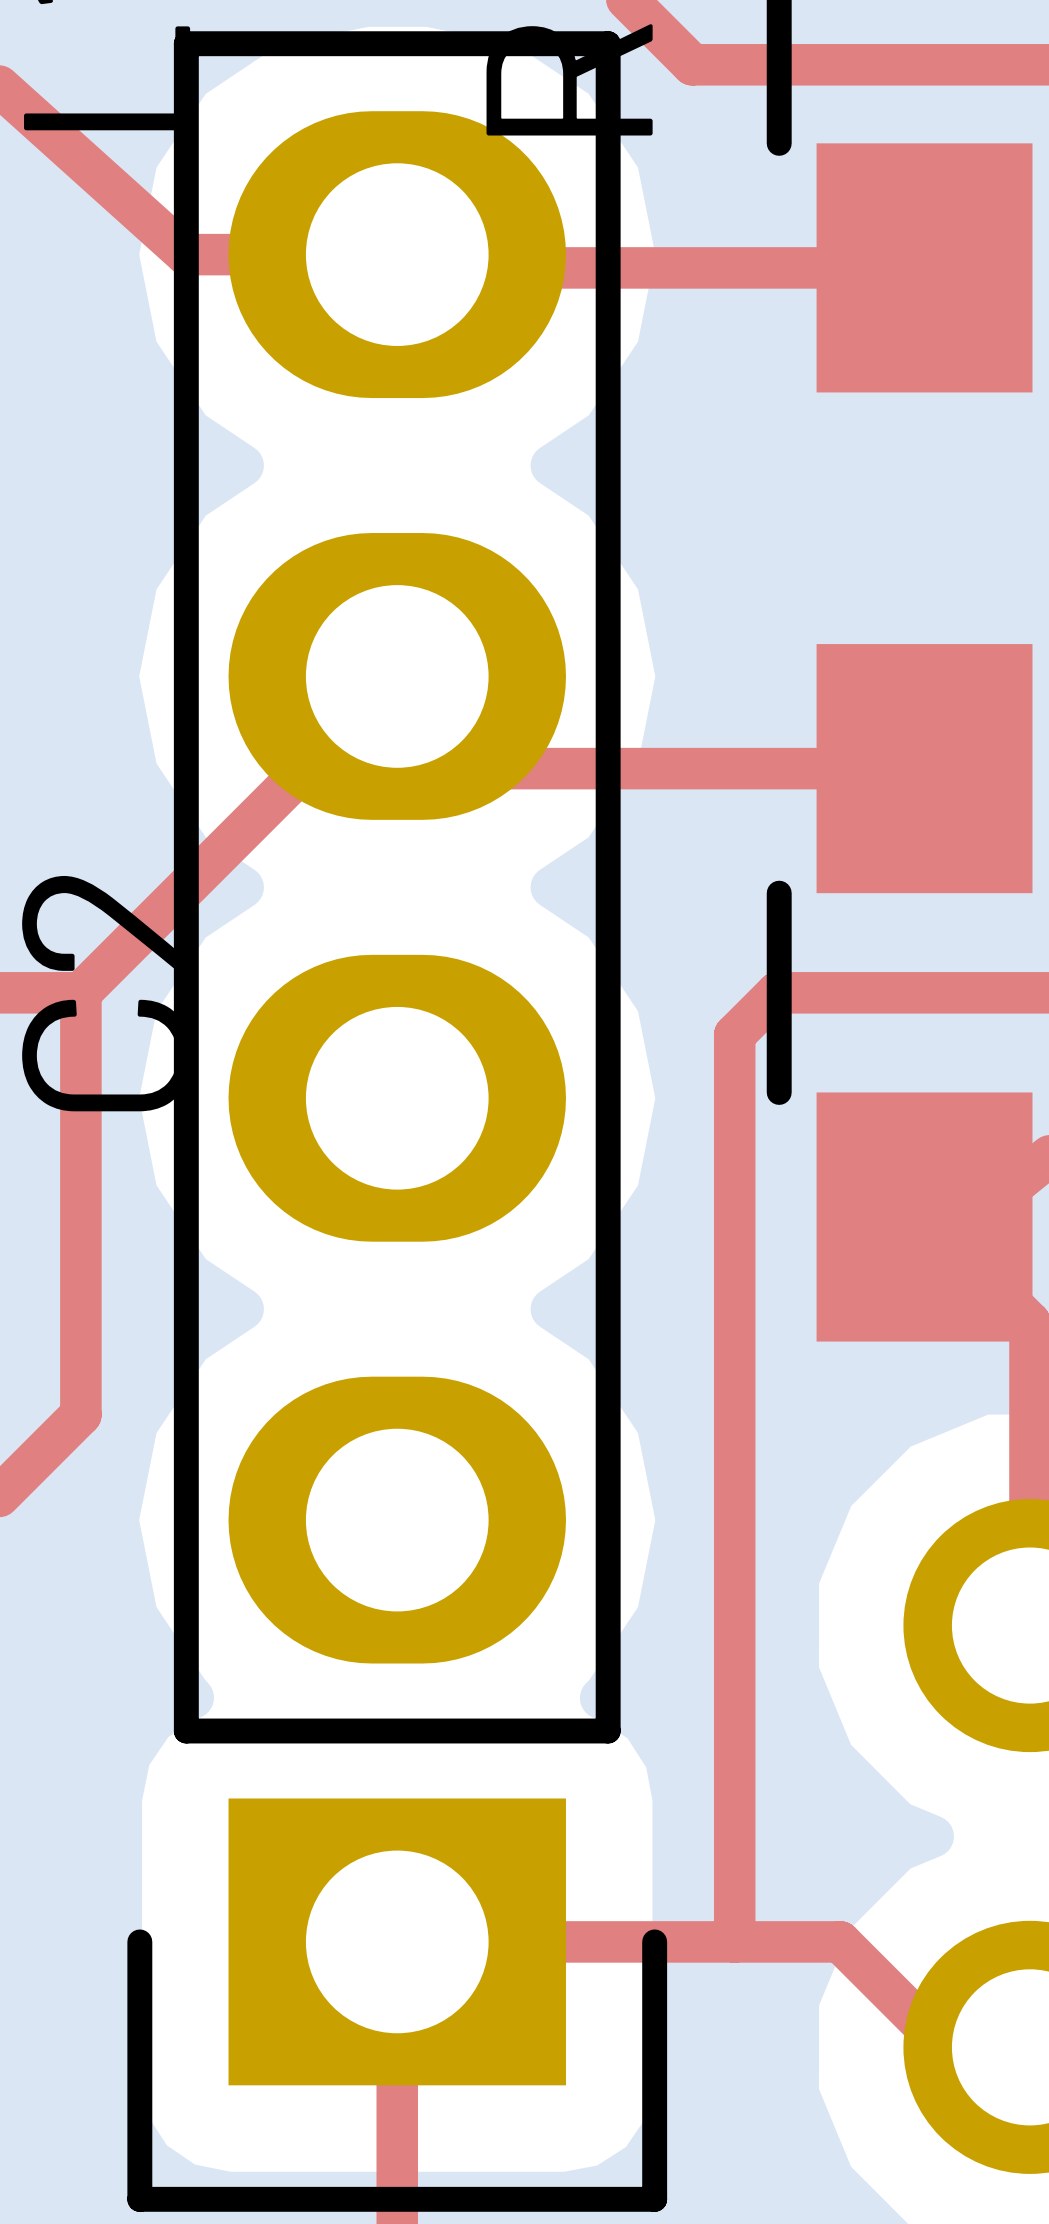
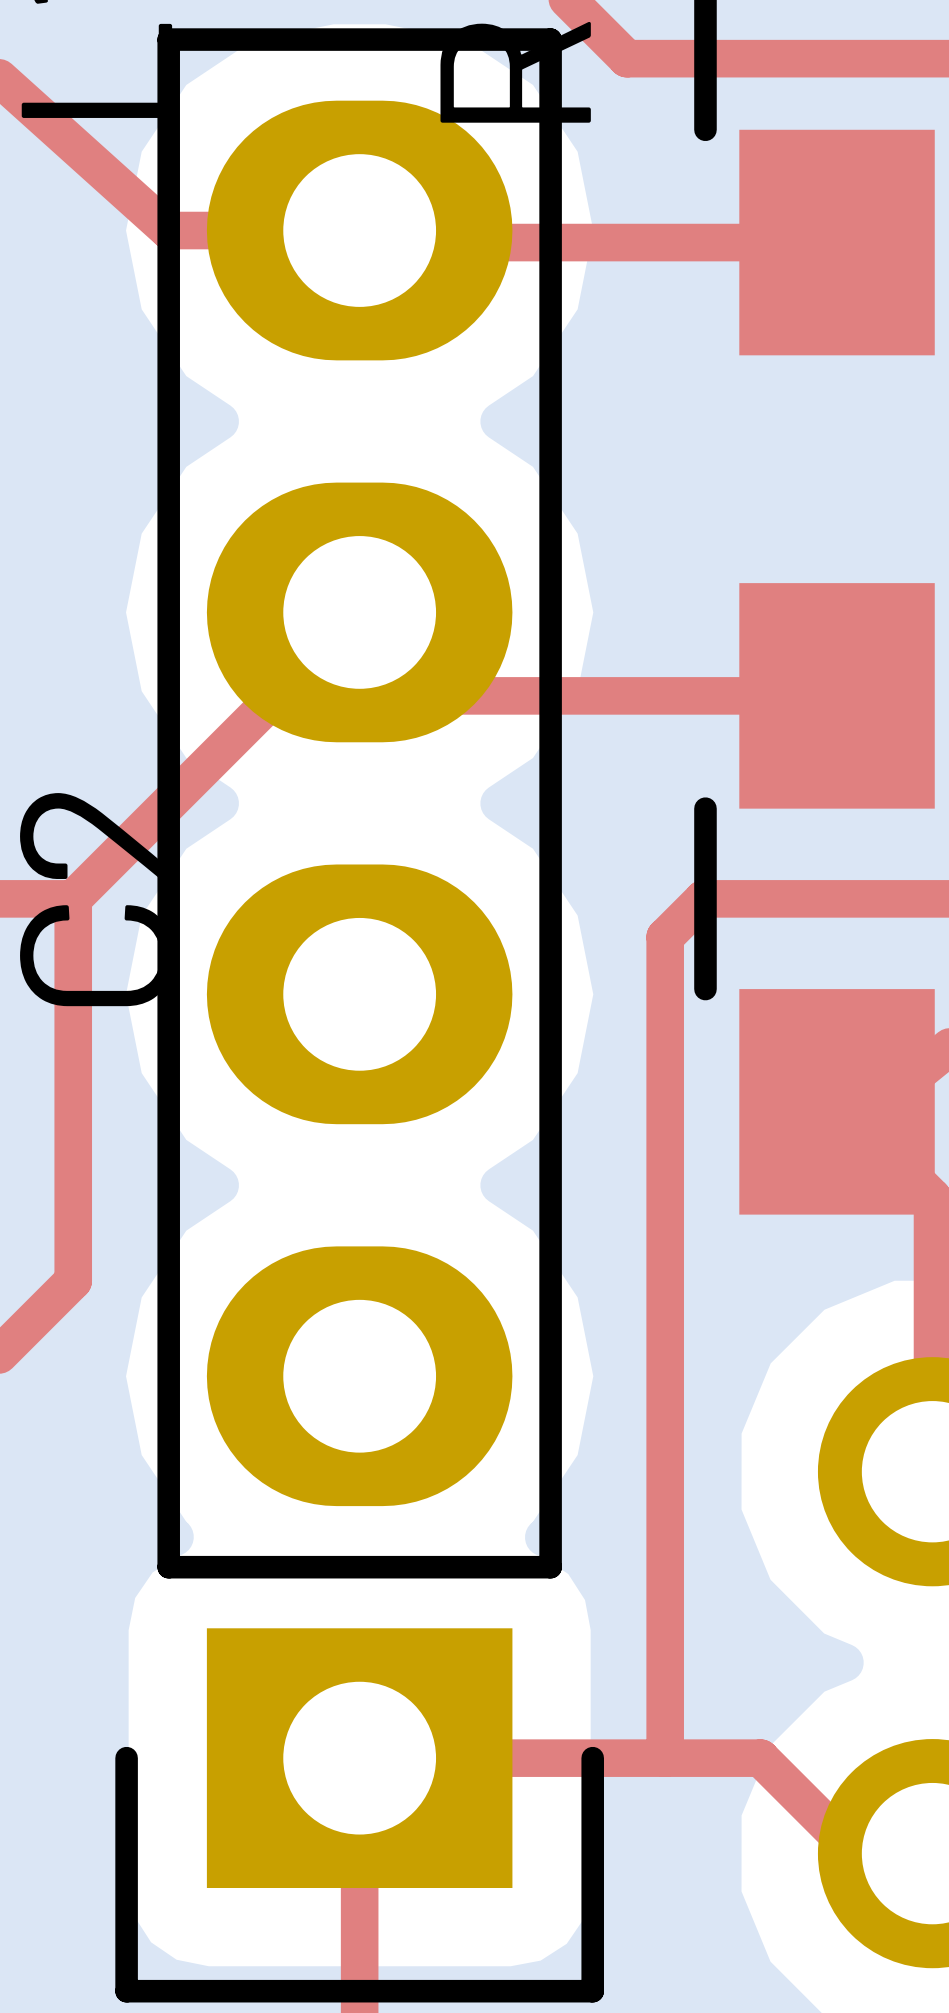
part footprint: [127, 31, 668, 2212] -> [115, 28, 604, 2003]

